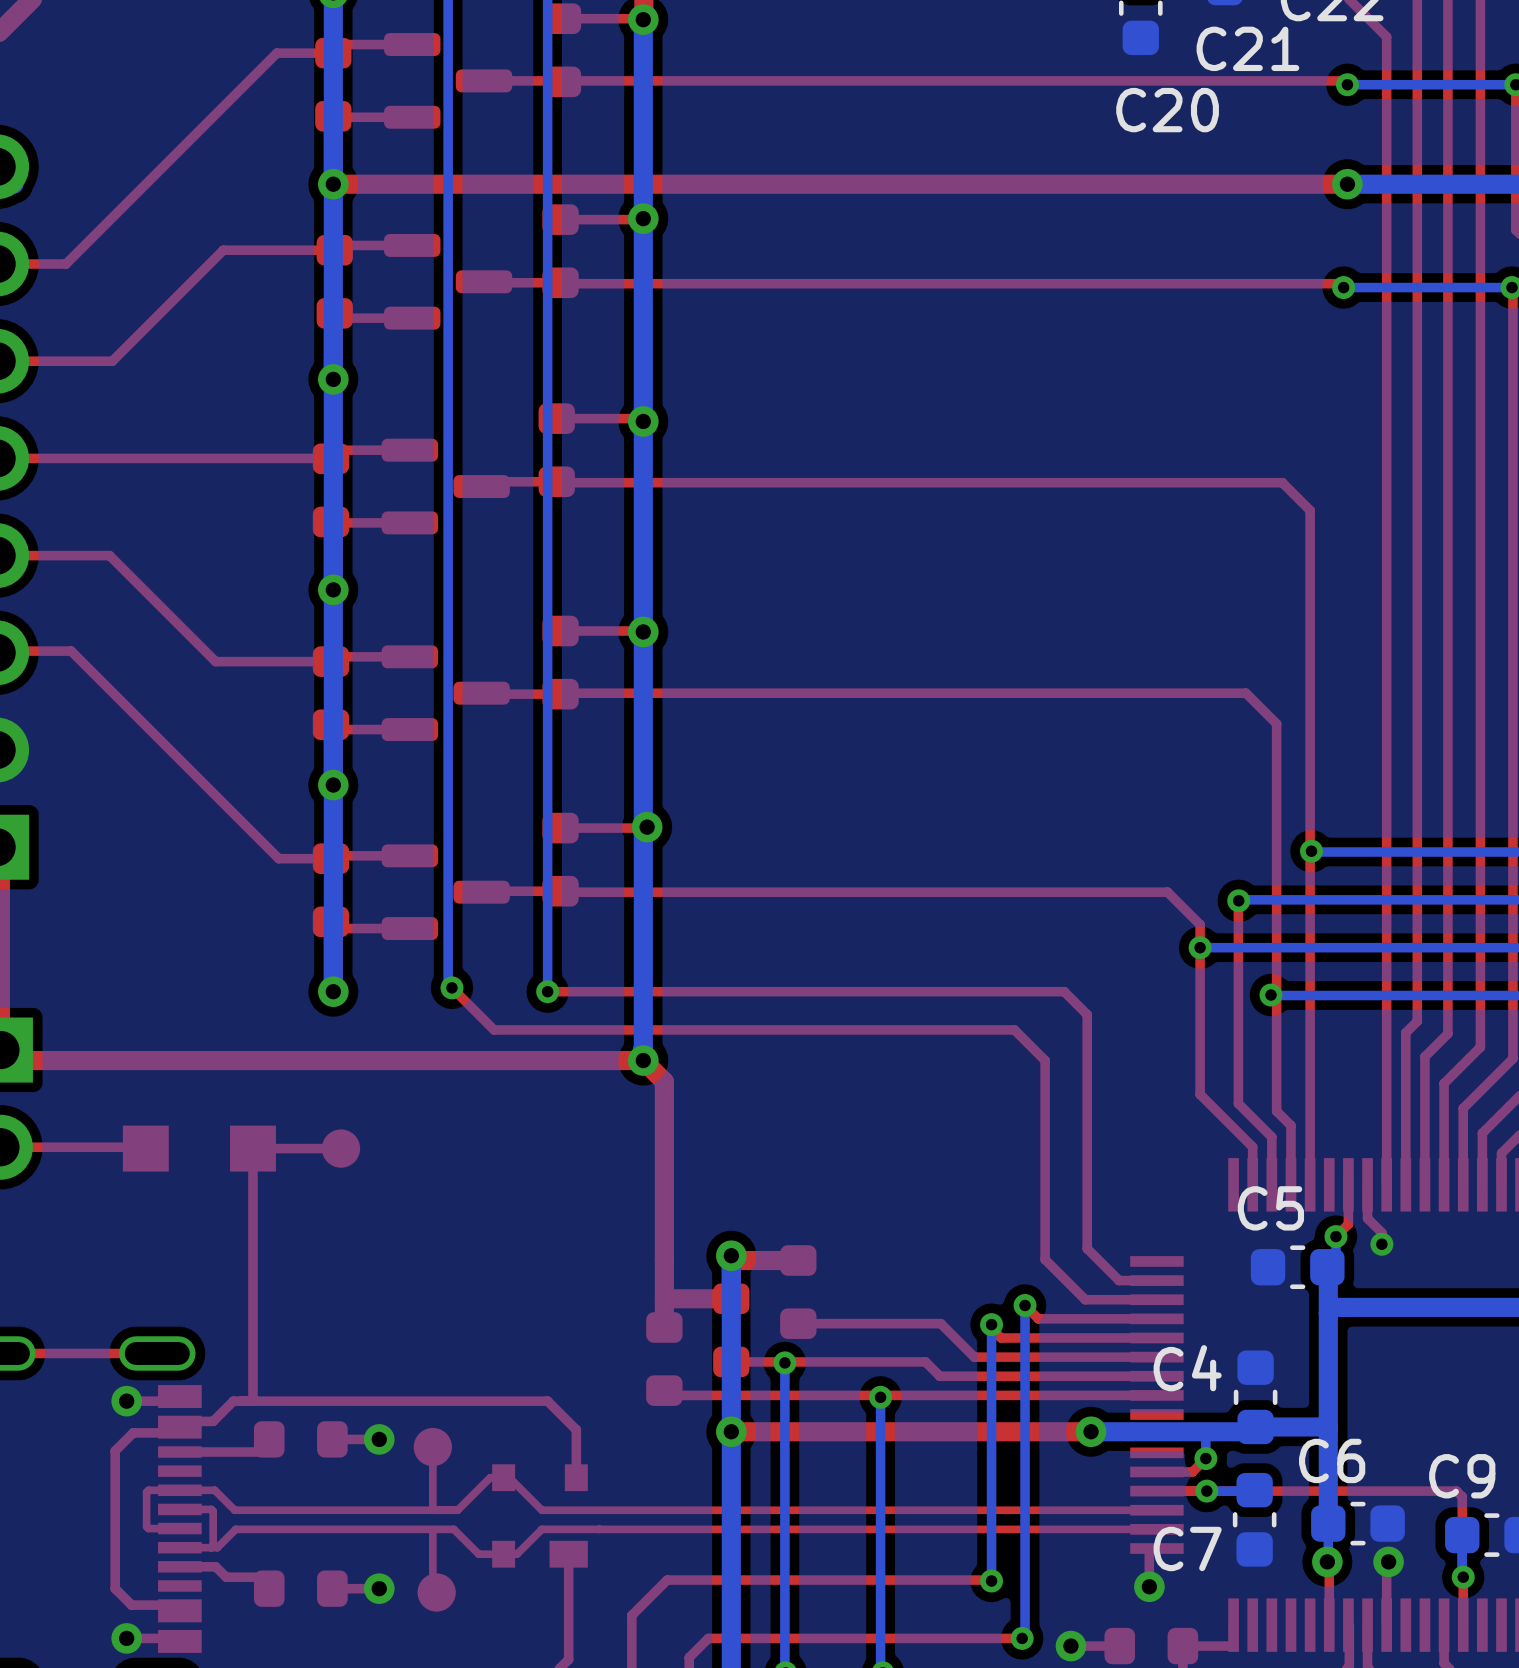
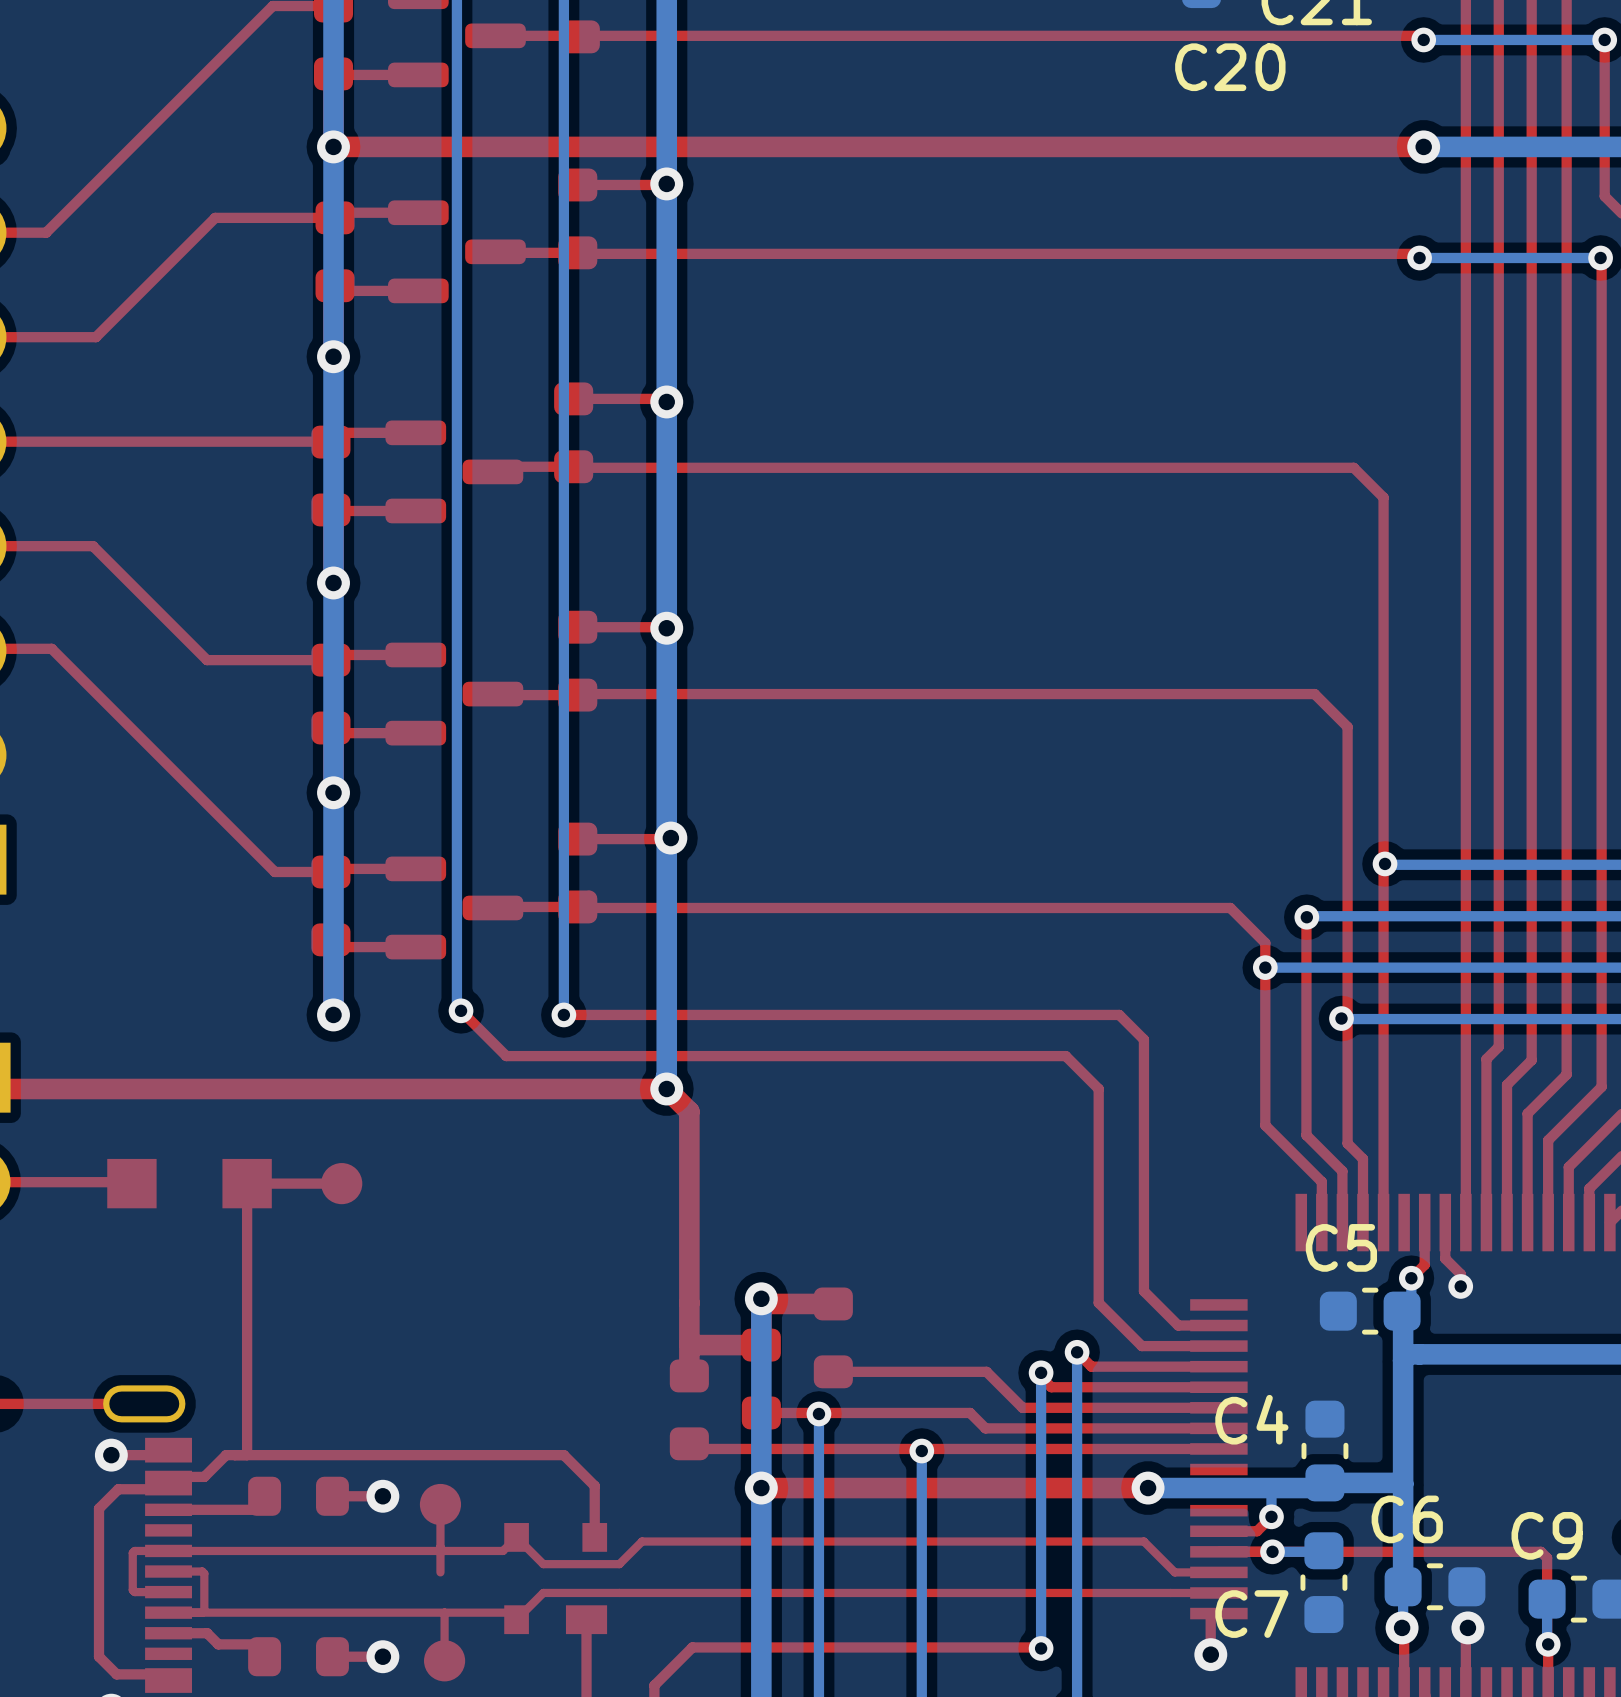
top track: (214, 1490) (234, 1510) (457, 1510) (490, 1477) (509, 1477) (541, 1510) (1115, 1510) -> (206, 1550) (503, 1550) (516, 1537) (543, 1564) (619, 1564) (642, 1541) (1143, 1541) (1174, 1572)
top track: (541, 1529) (517, 1554) (478, 1554) (453, 1529) (235, 1529) (217, 1547) -> (557, 1592) (543, 1592) (516, 1619) (509, 1612) (208, 1612)
top track: (432, 1531) (432, 1588) (436, 1592) -> (444, 1612) (444, 1660)

